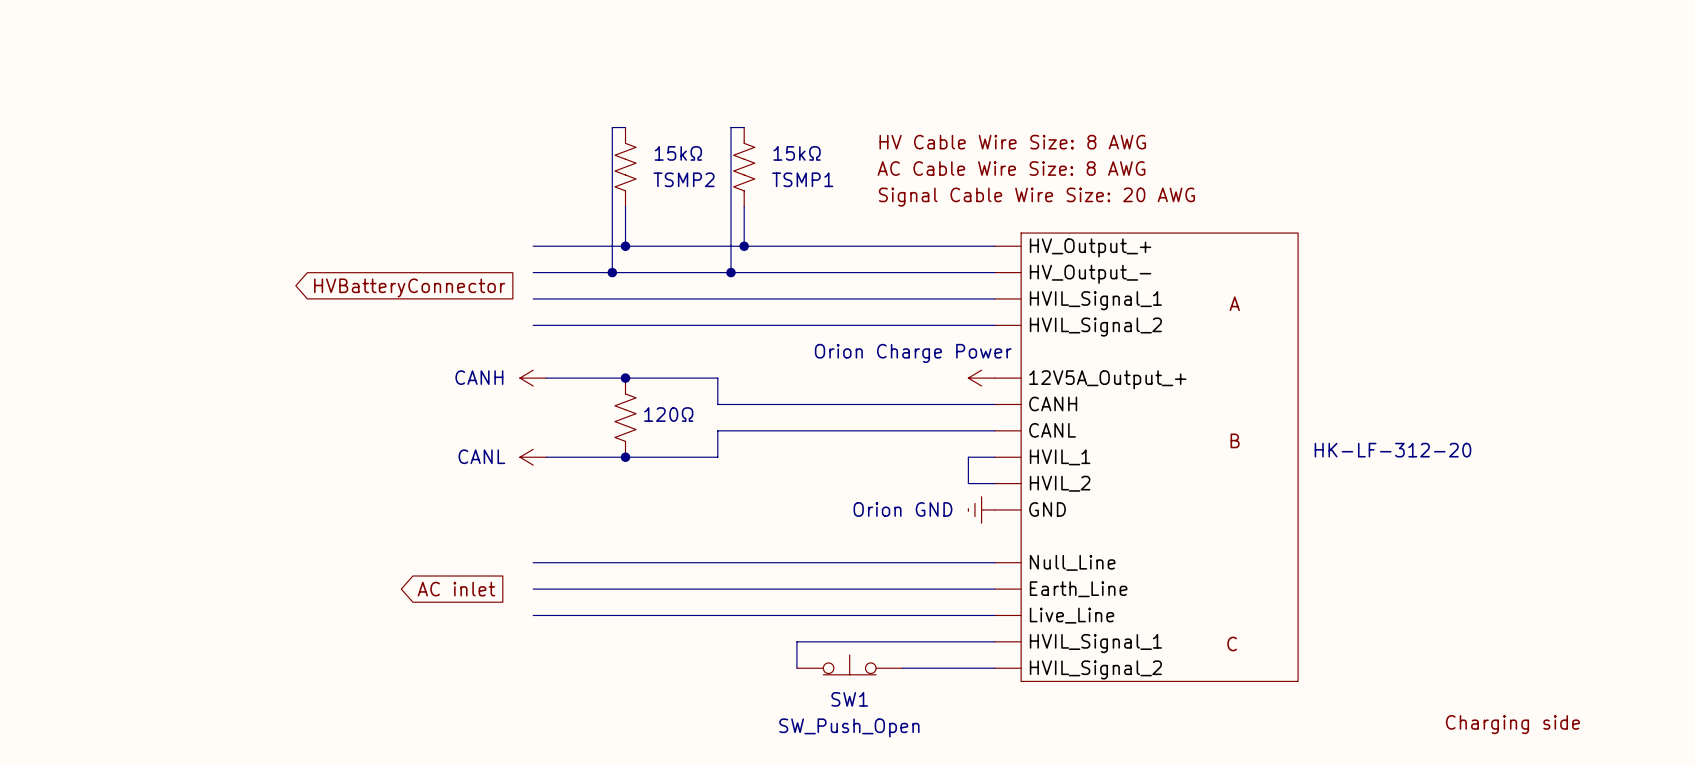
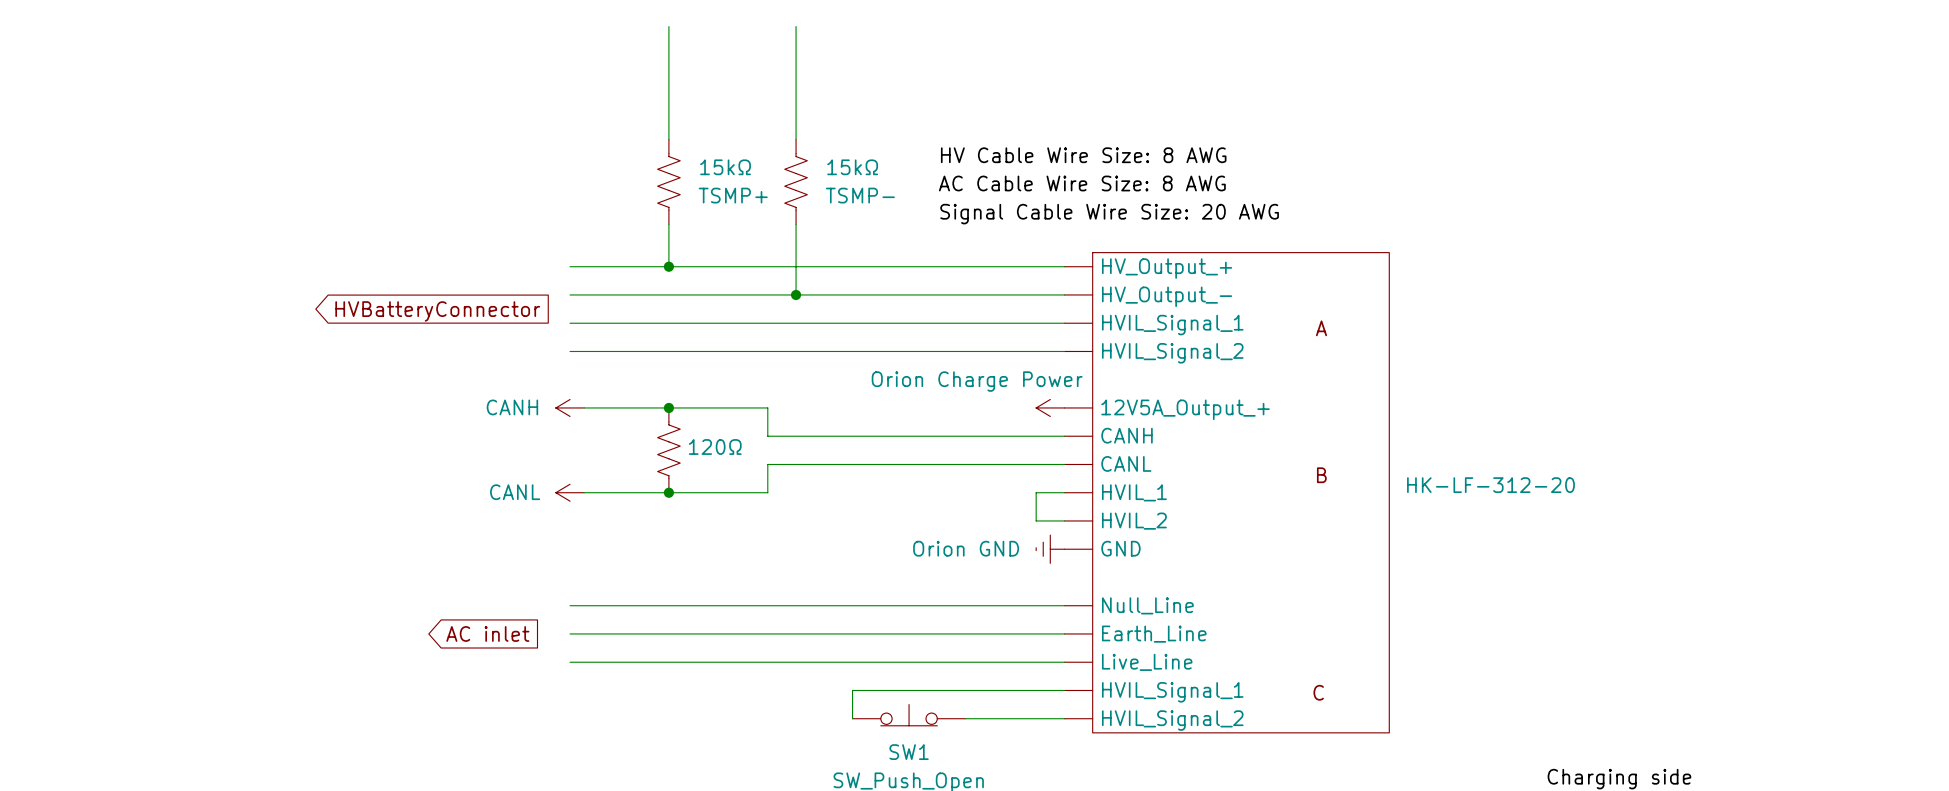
wire: (625, 127) (612, 127) (612, 272) -> (668, 139) (668, 26)
wire: (744, 127) (731, 127) (731, 272) -> (796, 139) (796, 26)
15kΩ value: TSMP2 (684, 179) -> TSMP+ (733, 195)
15kΩ value: TSMP1 (802, 179) -> TSMP- (860, 195)
wire: none -> (796, 266) (796, 294)
junction: (744, 246) -> none
junction: (612, 272) -> none
junction: (731, 272) -> none
junction: none -> (796, 294)

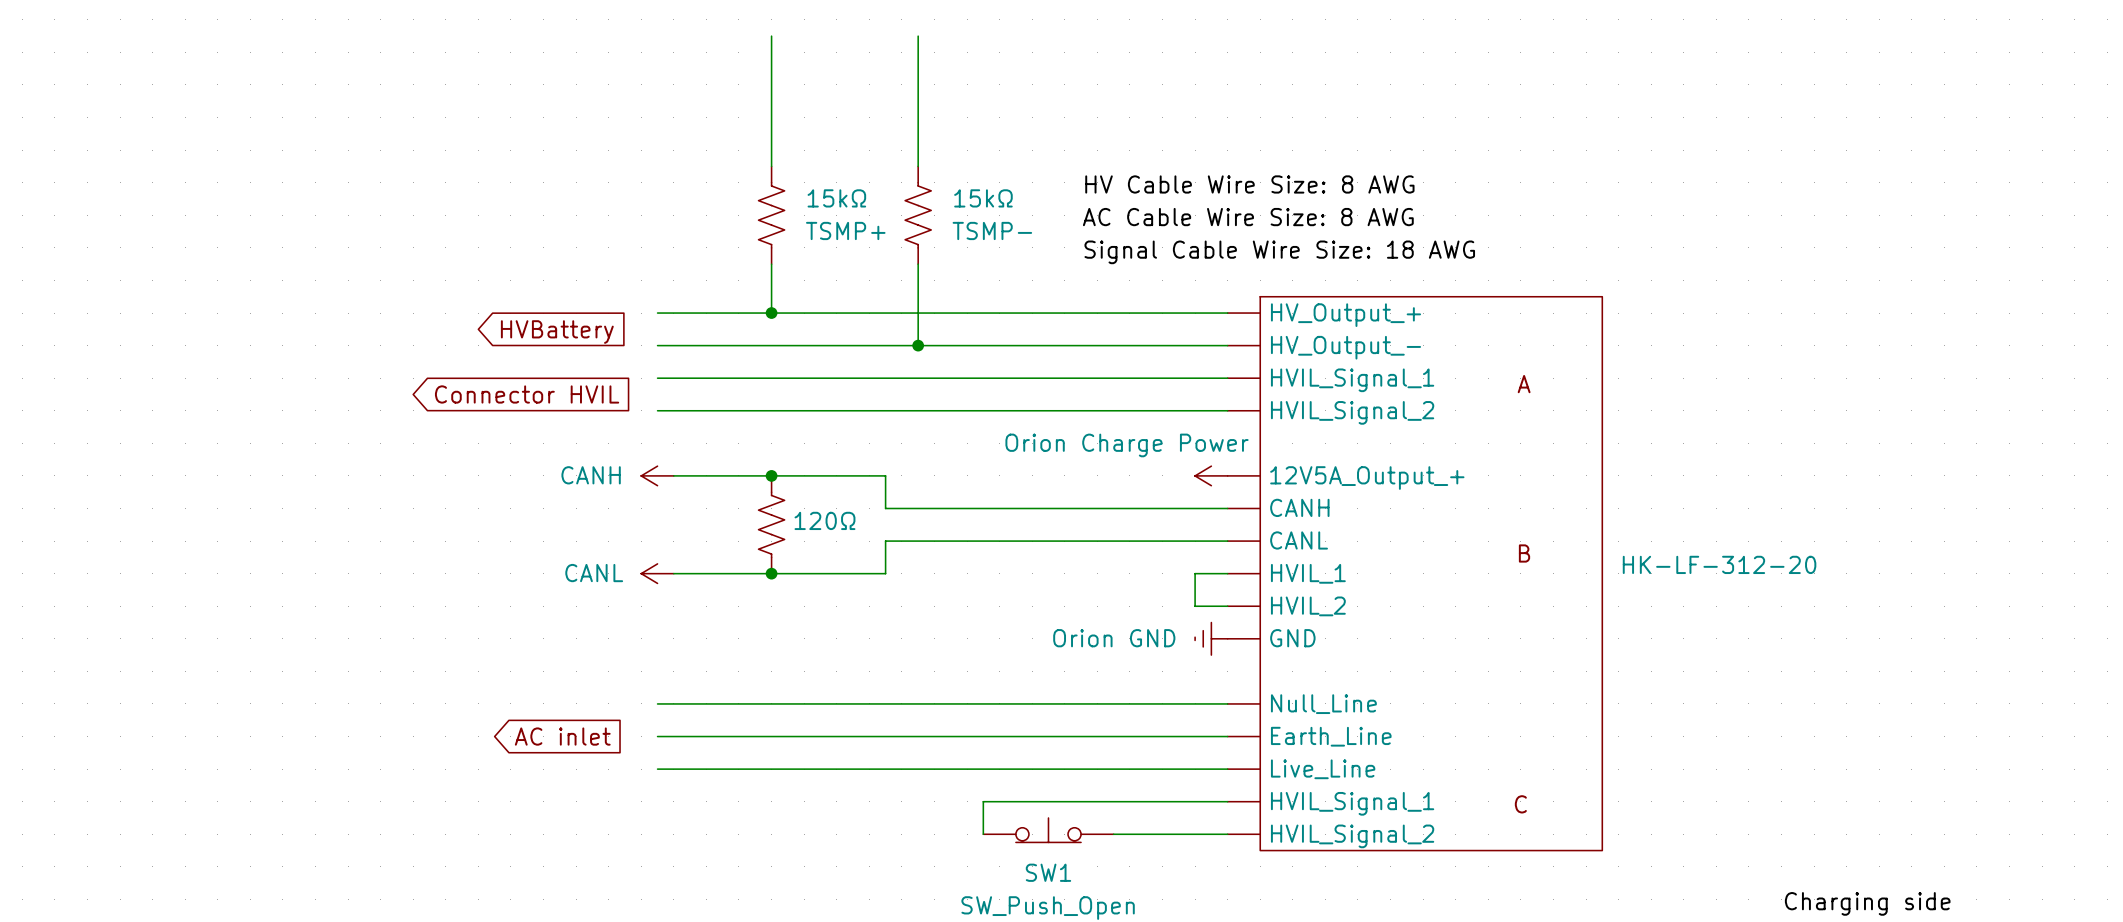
label: Signal Cable Wire Size: 20 AWG (1109, 214) -> Signal Cable Wire Size: 18 AWG (1279, 252)
global label: HVBatteryConnector (437, 311) -> HVBattery (557, 332)
global label: none -> Connector HVIL (527, 394)

